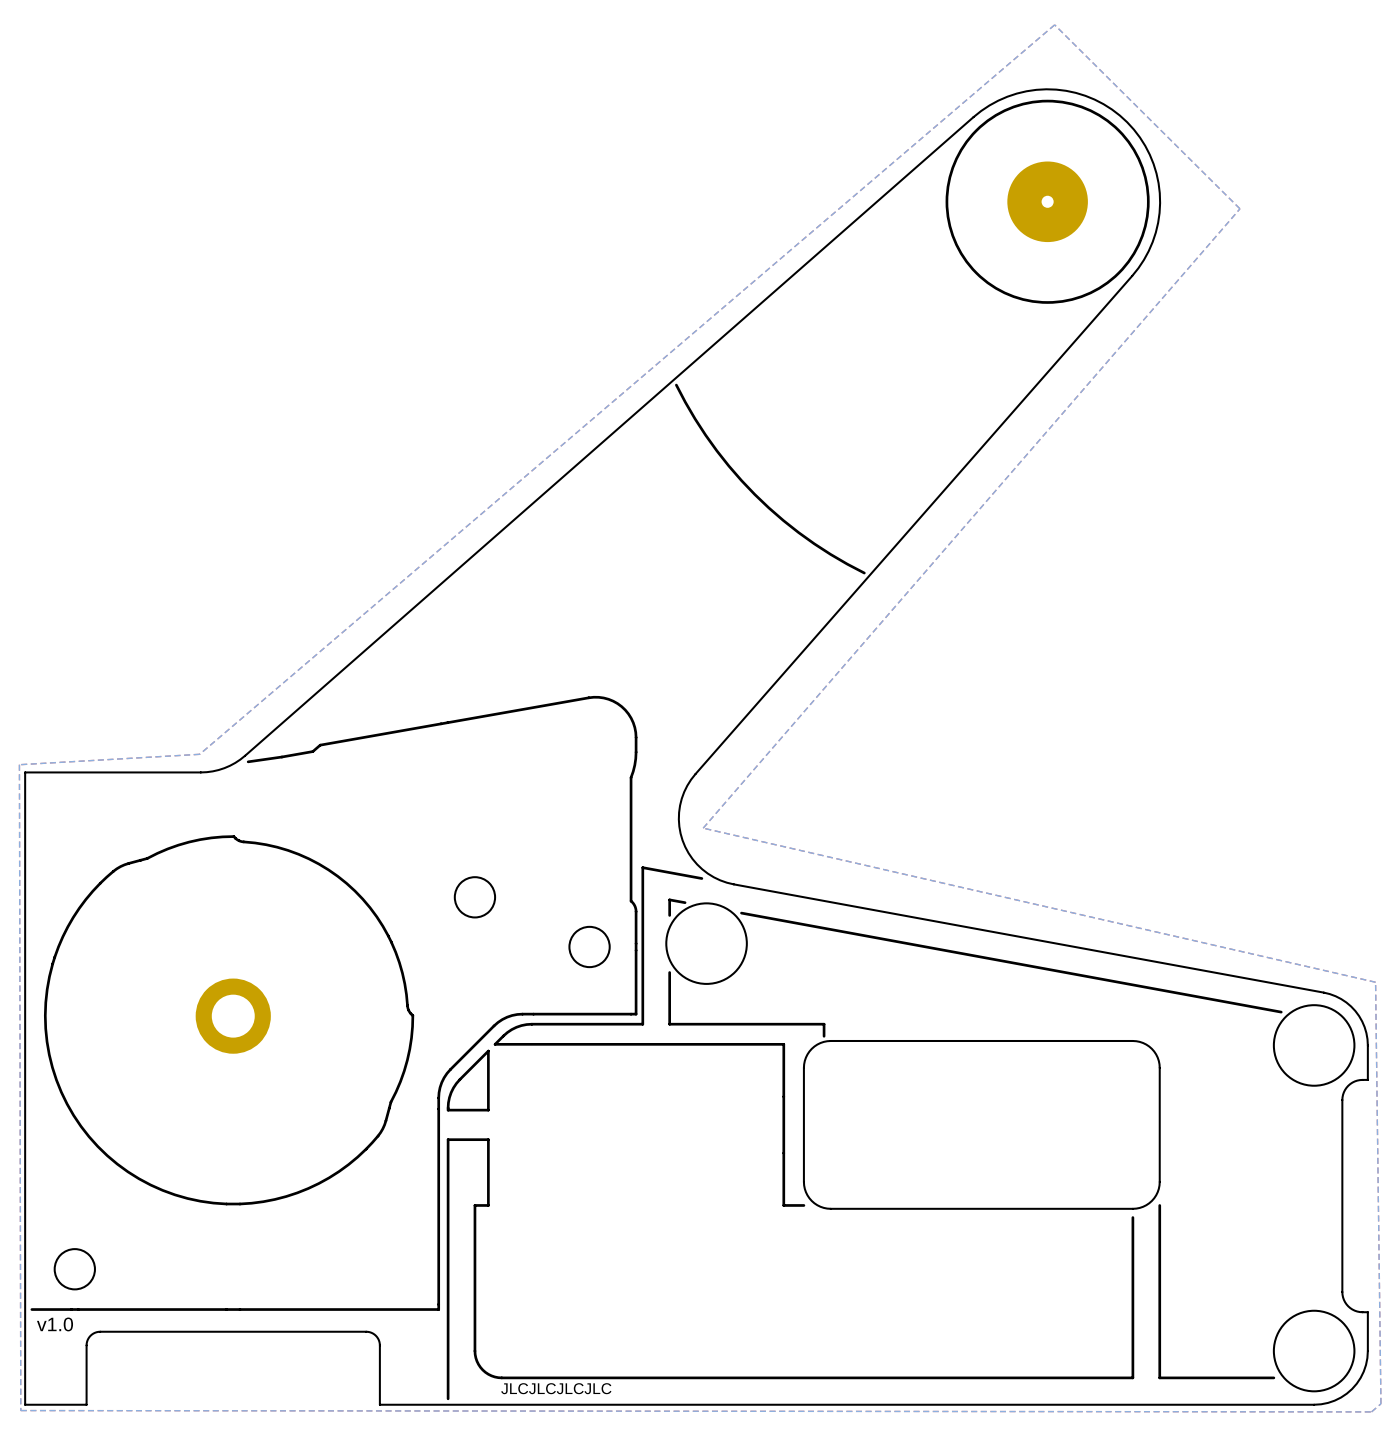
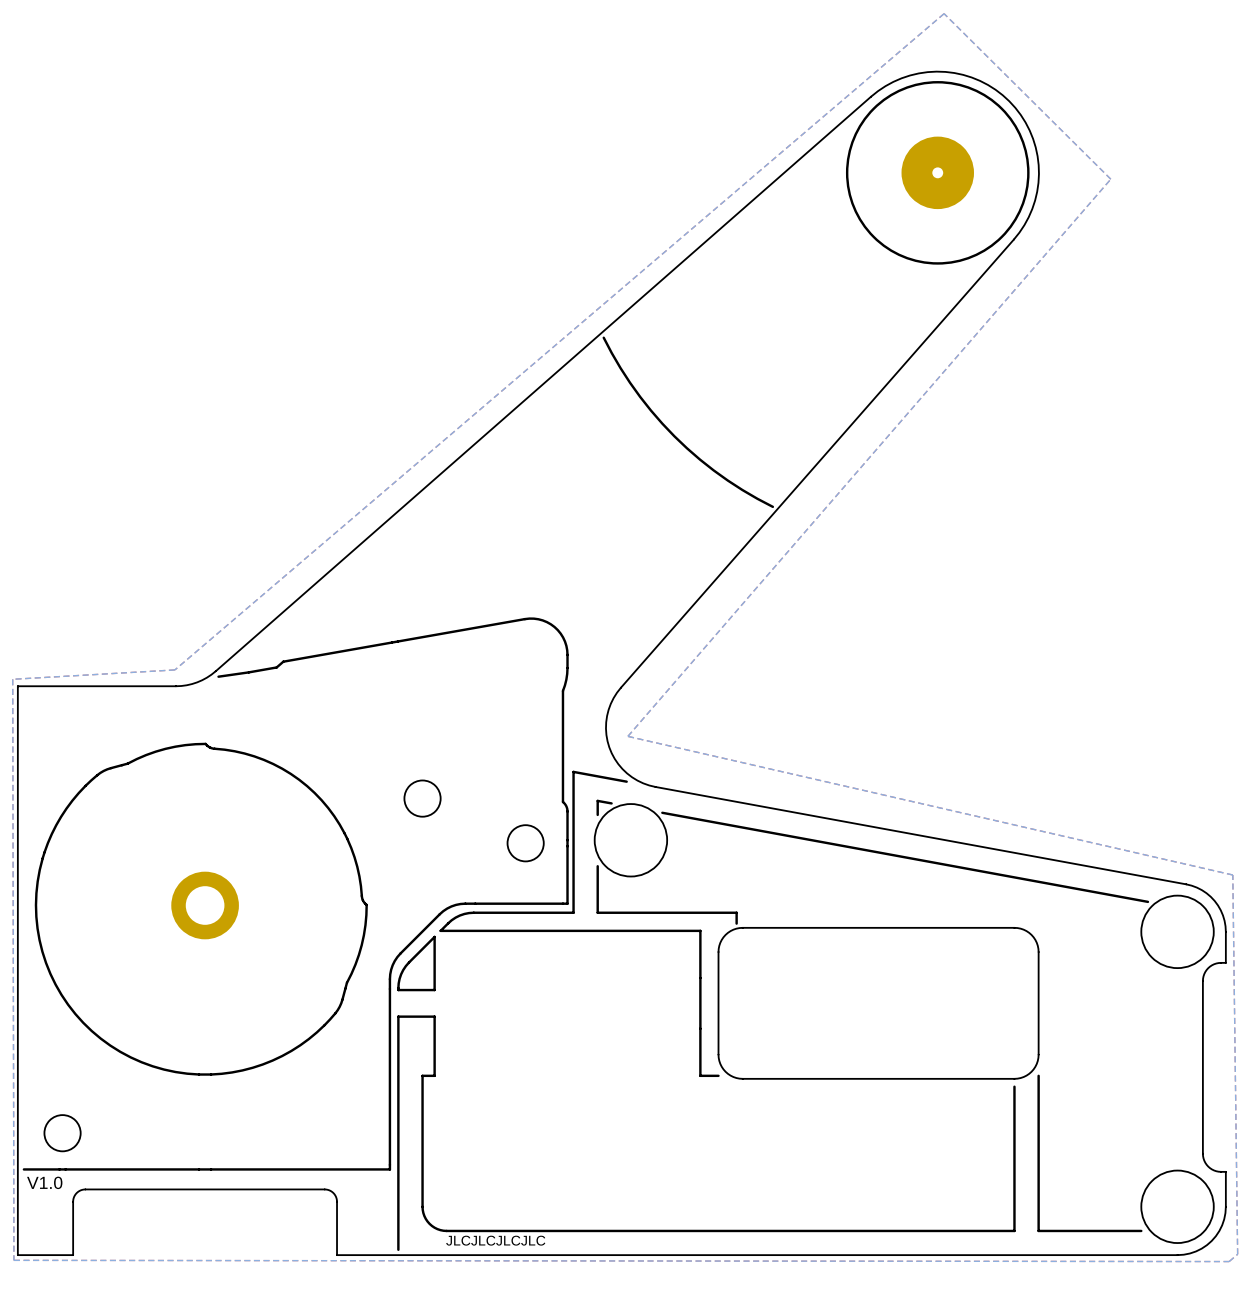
text: v1.0 (55, 1324) -> V1.0 (44, 1182)

